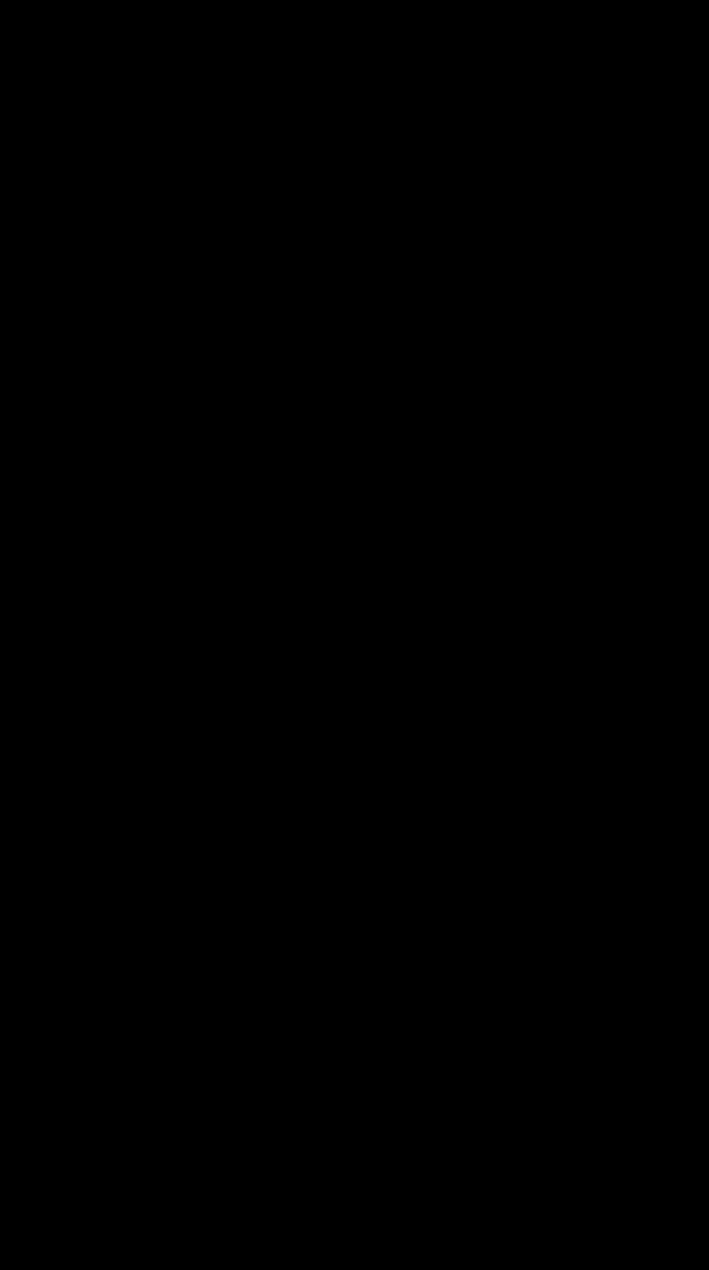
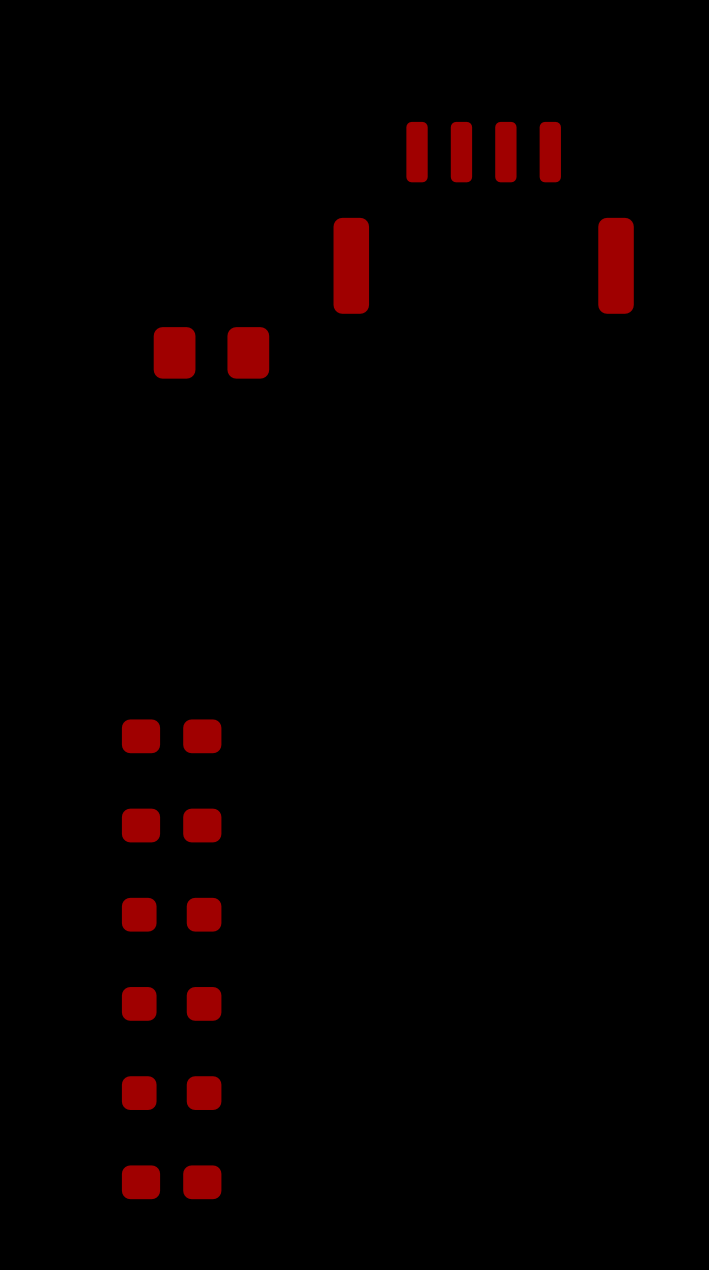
part: none -> (483, 217)
part: none -> (211, 352)
part: none -> (171, 736)
part: none -> (171, 825)
part: none -> (171, 914)
part: none -> (171, 1003)
part: none -> (171, 1093)
part: none -> (171, 1182)

